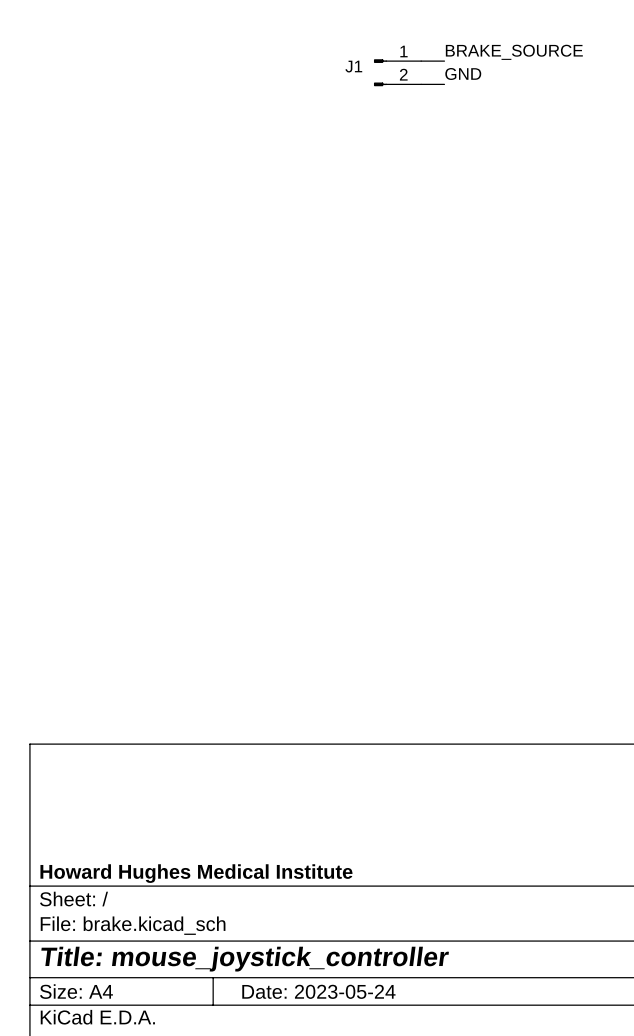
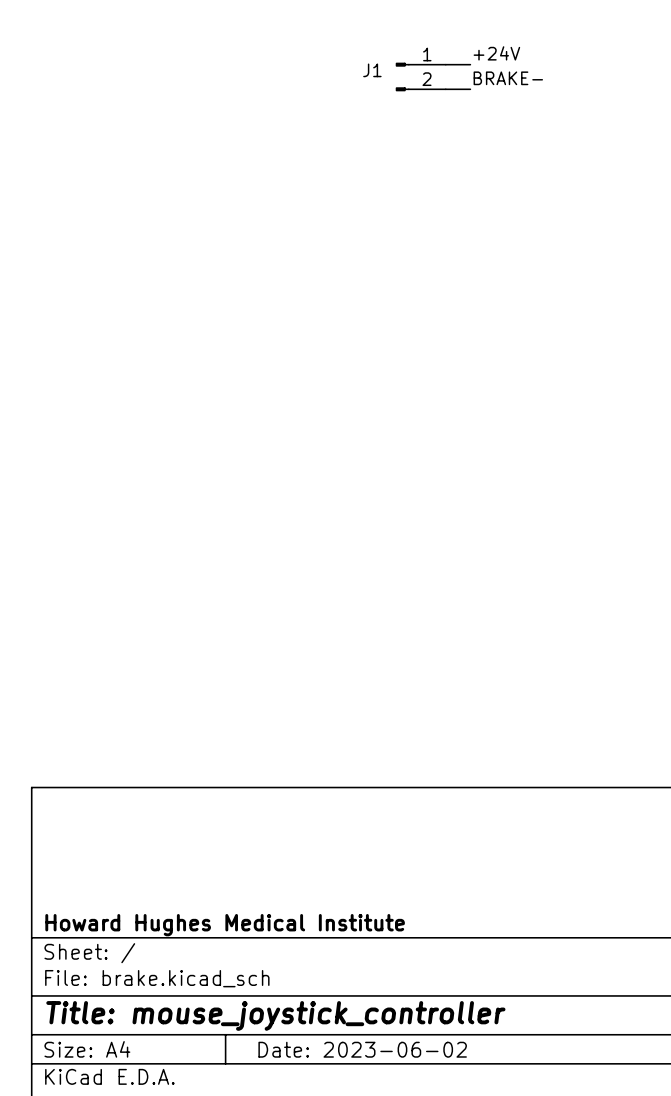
label: BRAKE_SOURCE (514, 52) -> +24V (496, 53)
label: GND (463, 73) -> BRAKE- (508, 78)
title block: Date: 2023-05-24 (318, 991) -> Date: 2023-06-02 (362, 1049)

